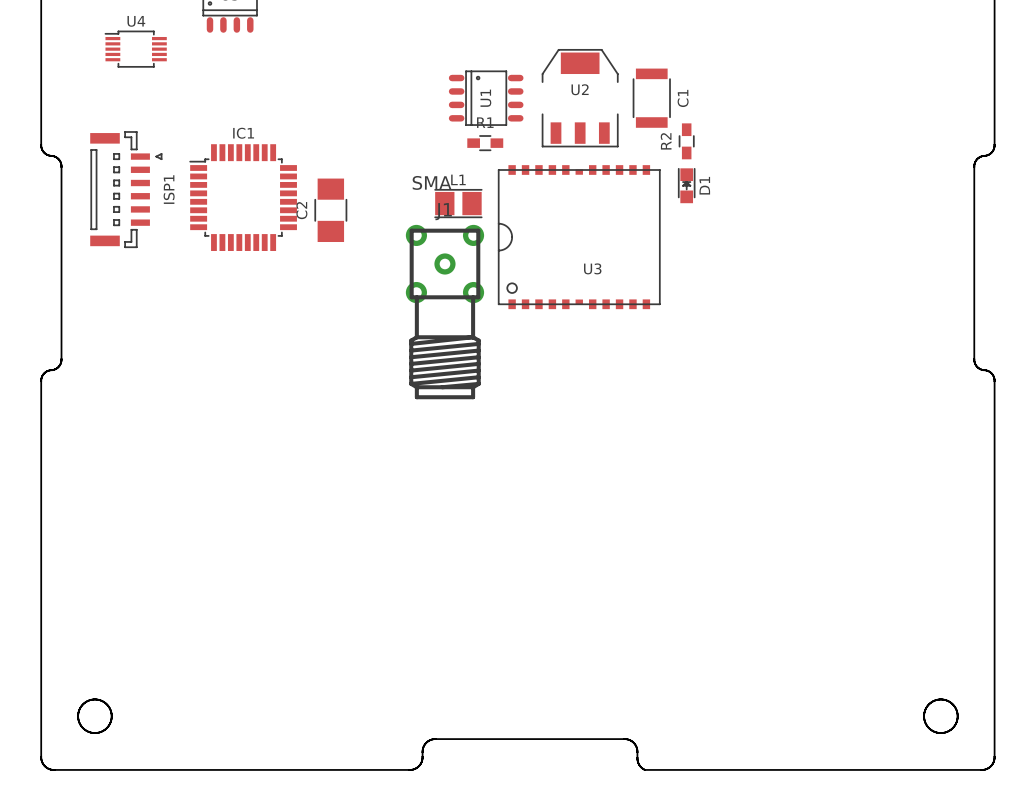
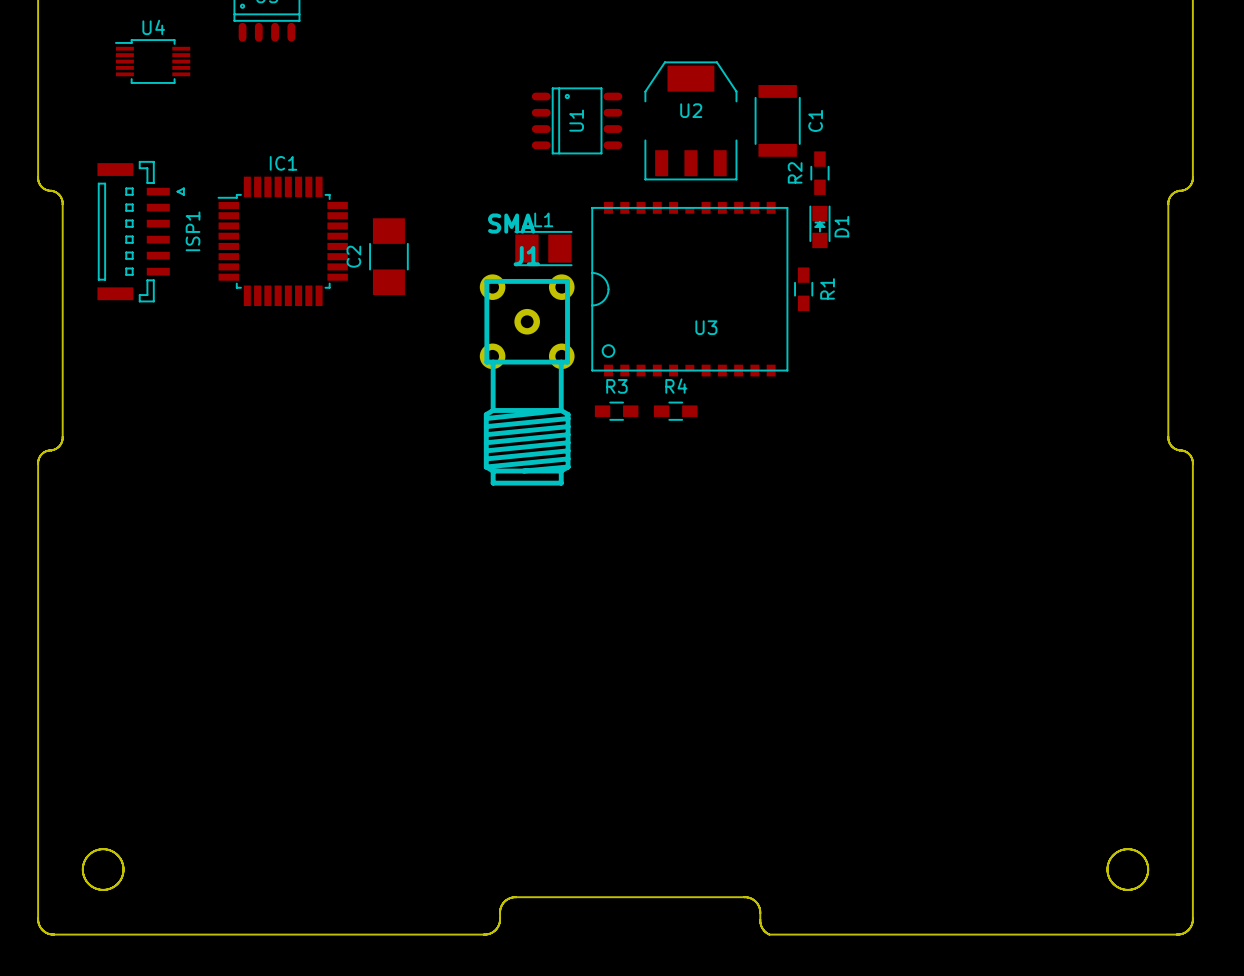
R1 rotation: 0° (485, 143) -> 90° clockwise (803, 289)
R1 position: (485, 143) -> (803, 289)
R3: none -> (616, 411)
R4: none -> (675, 411)

